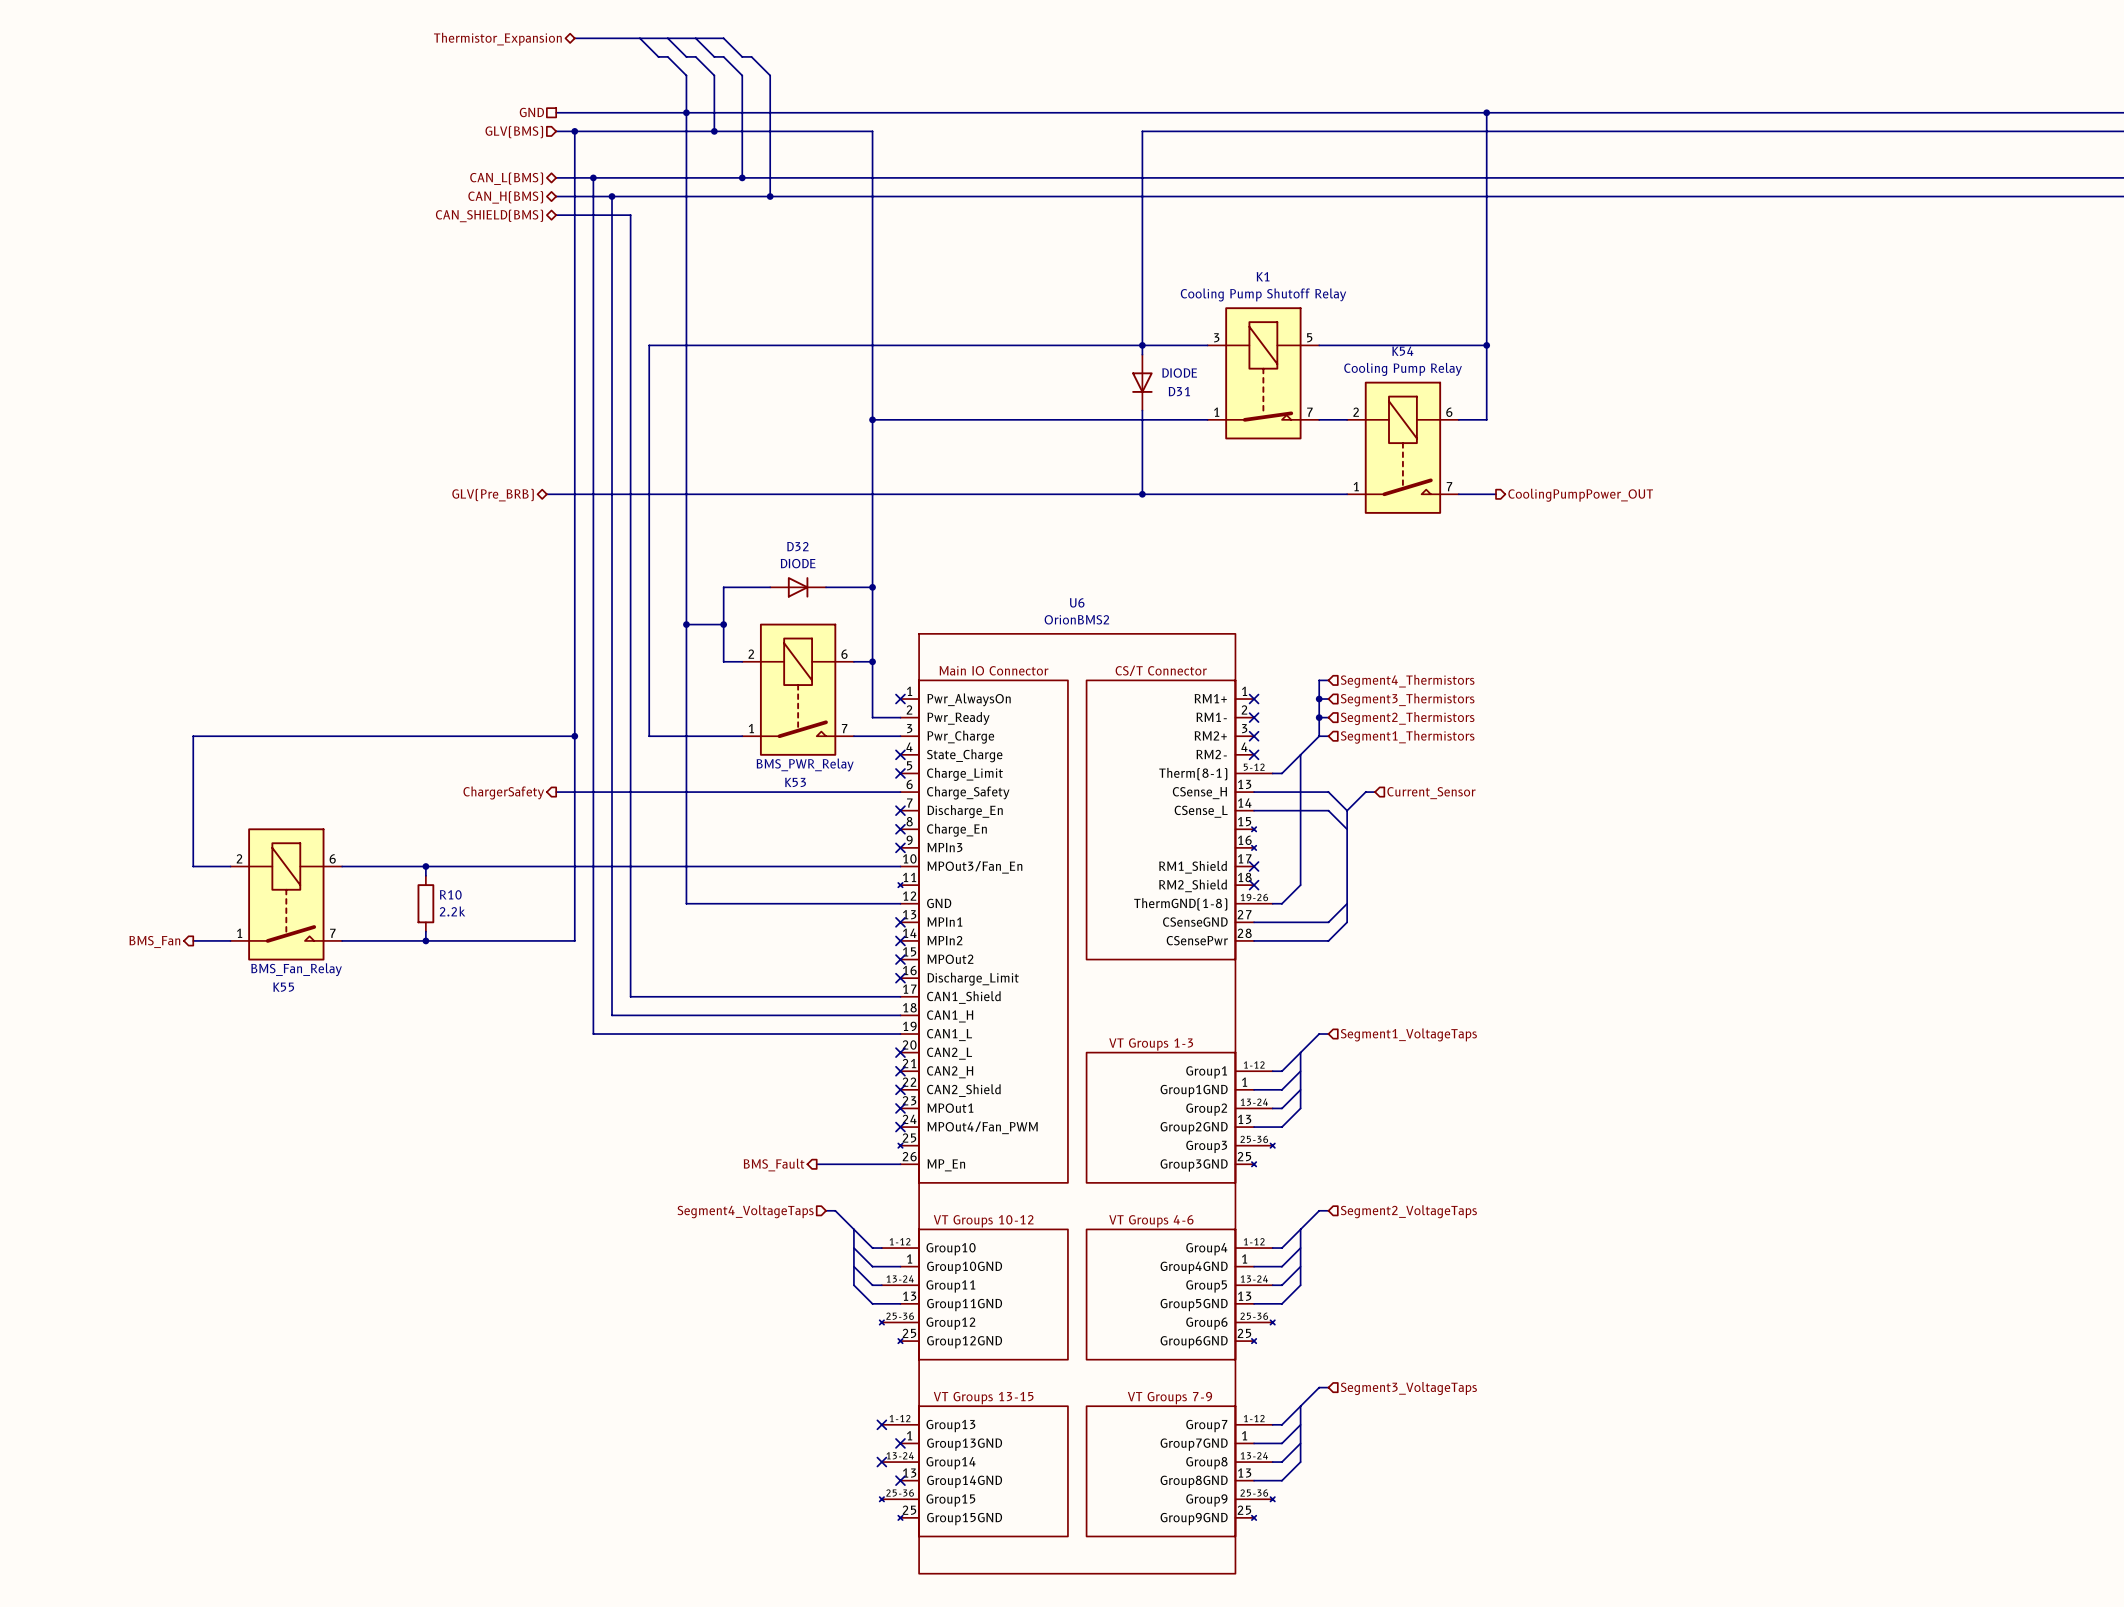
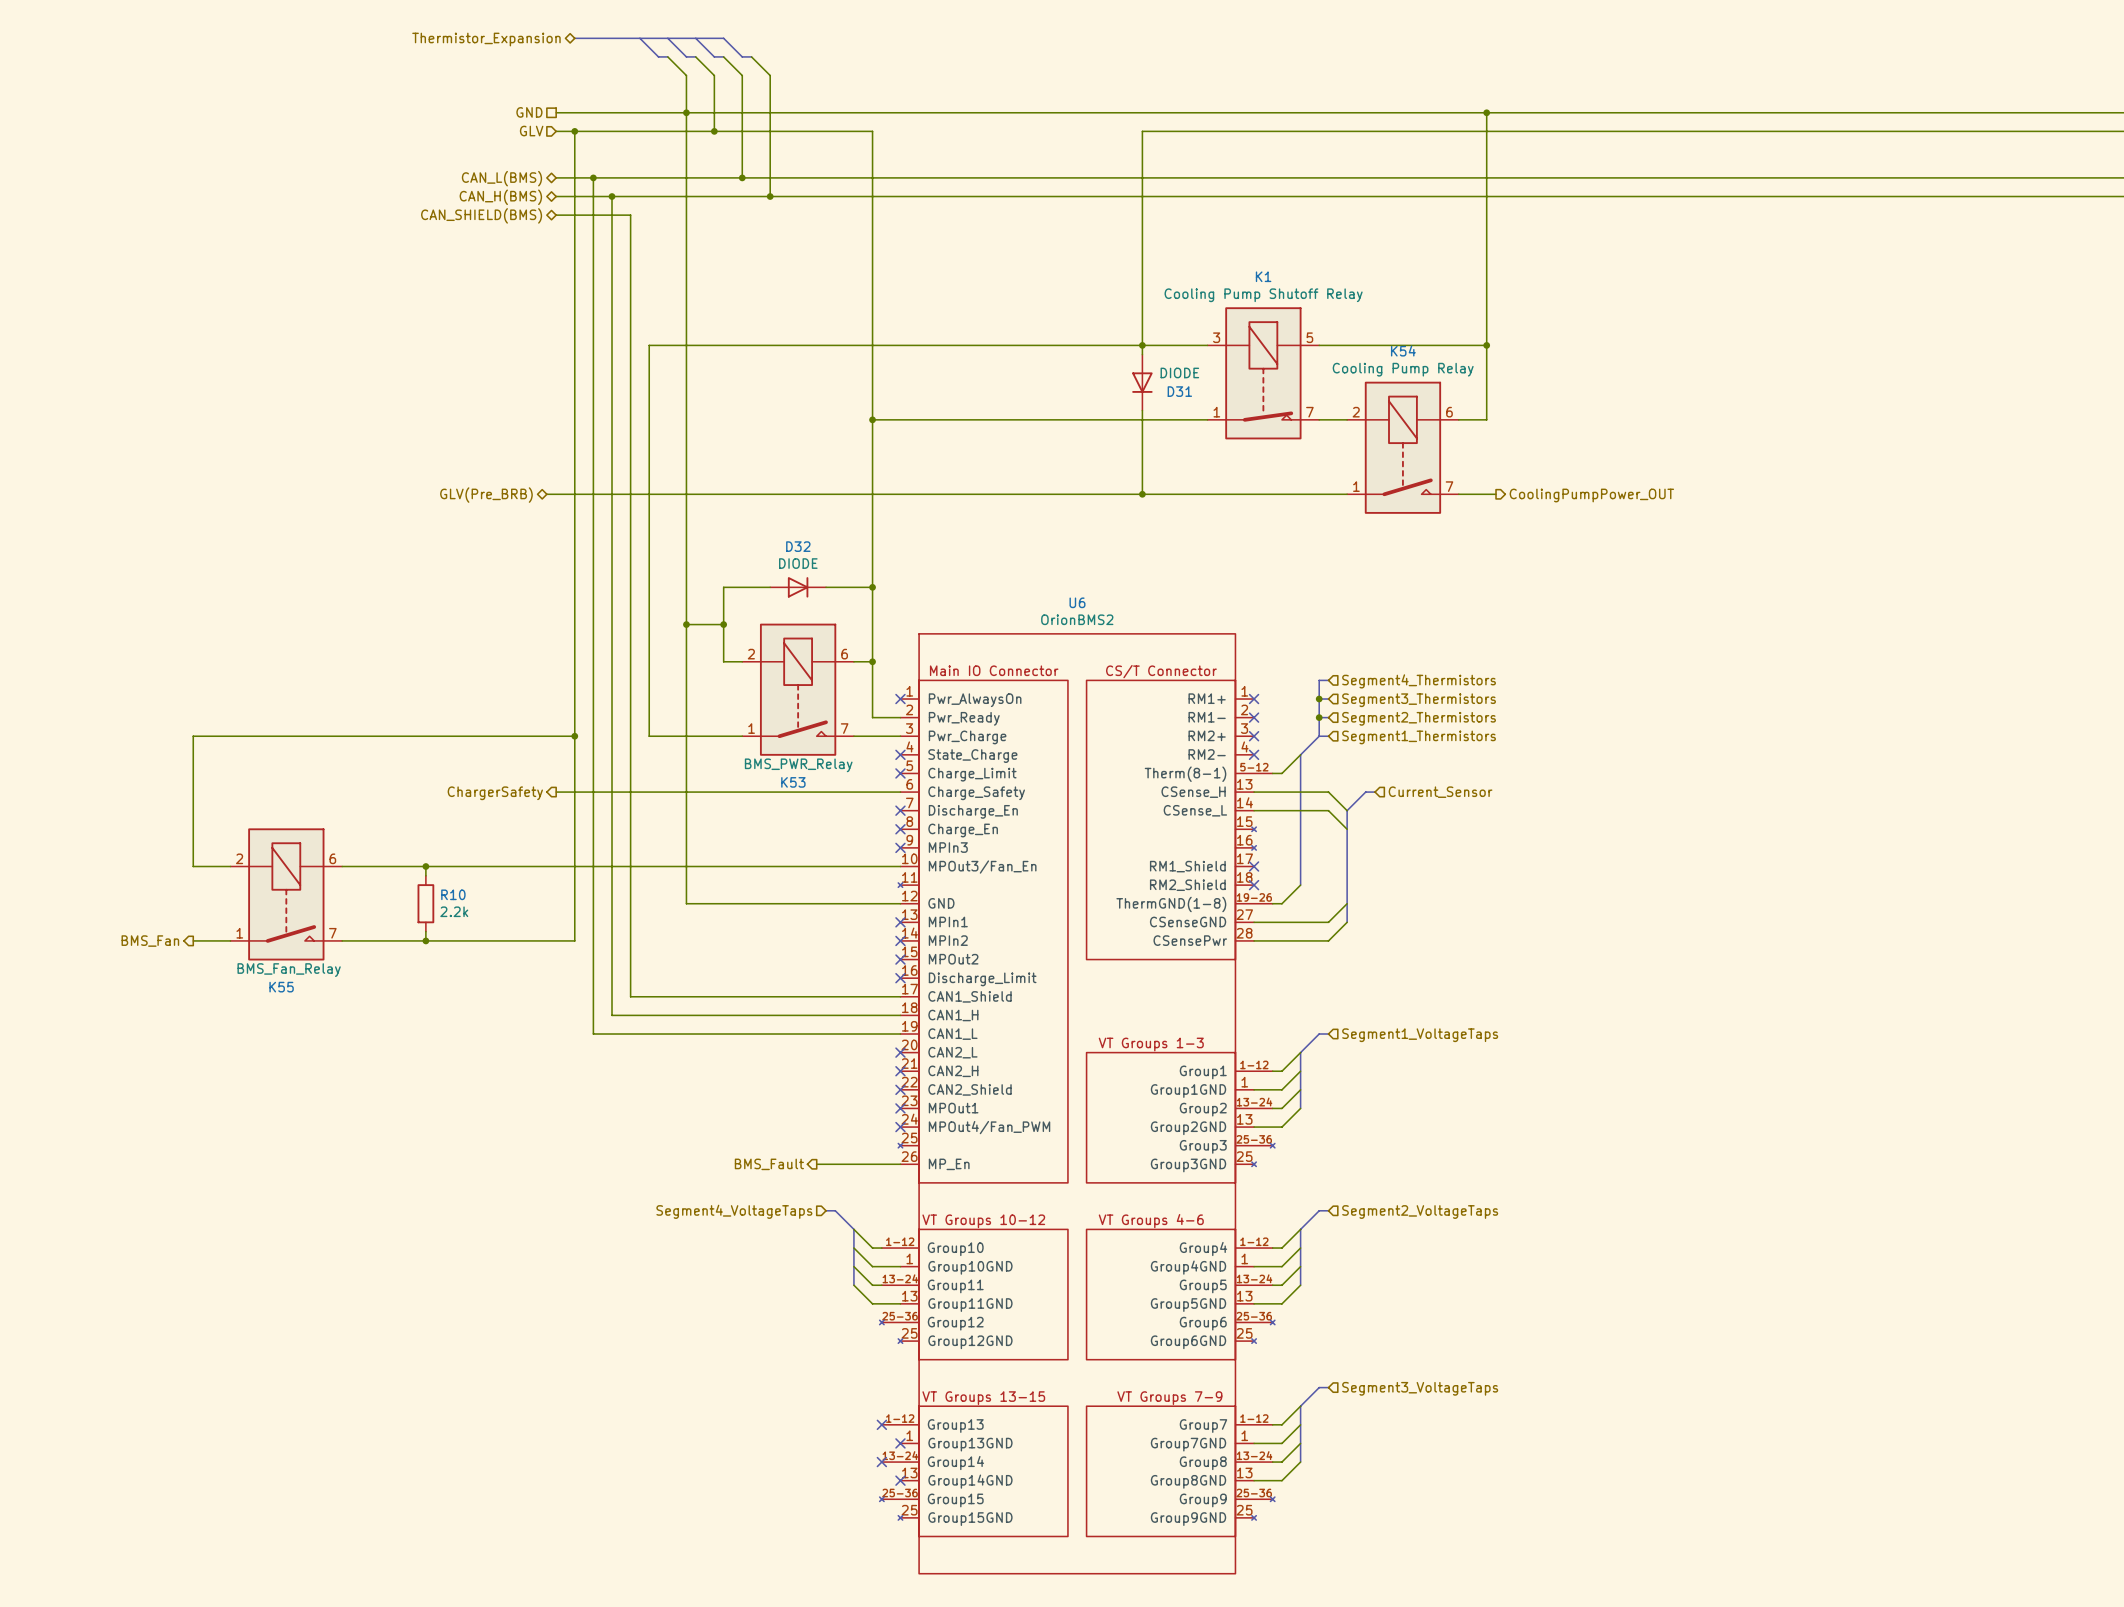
hierarchical label: GLV(BMS) (514, 132) -> GLV (531, 131)

